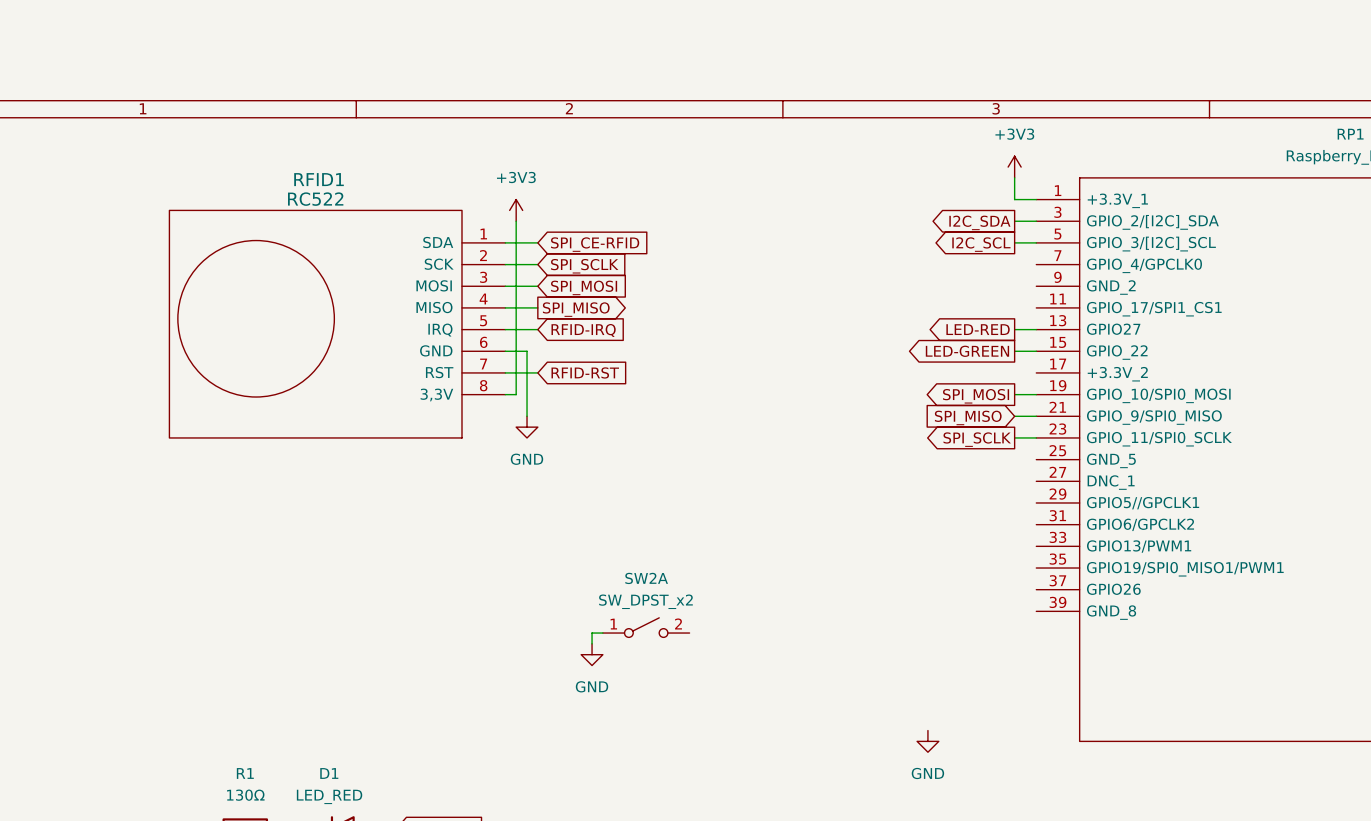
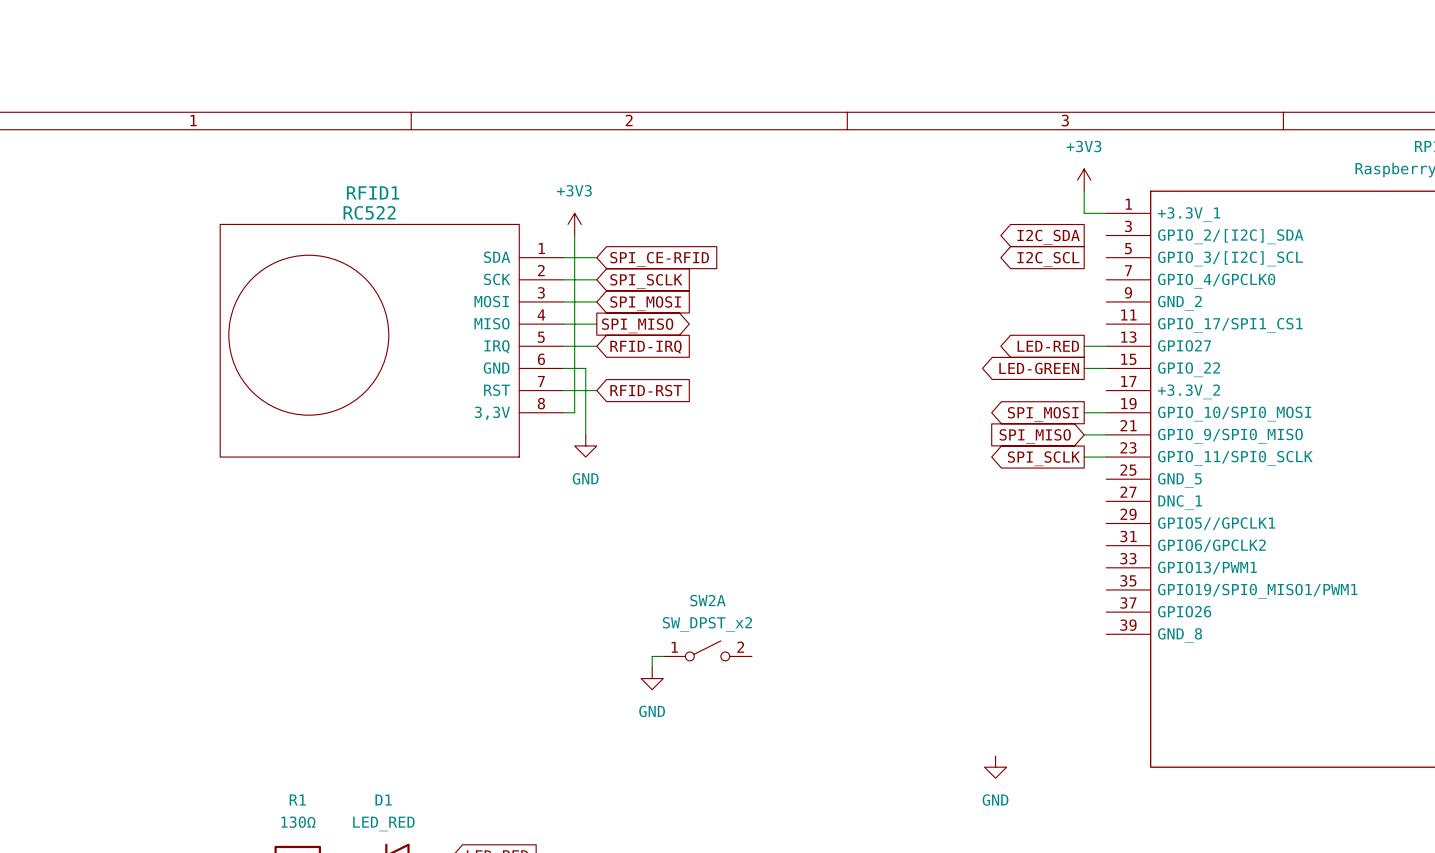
wire: (1014, 221) (1036, 221) -> none
wire: (1014, 242) (1036, 242) -> none

